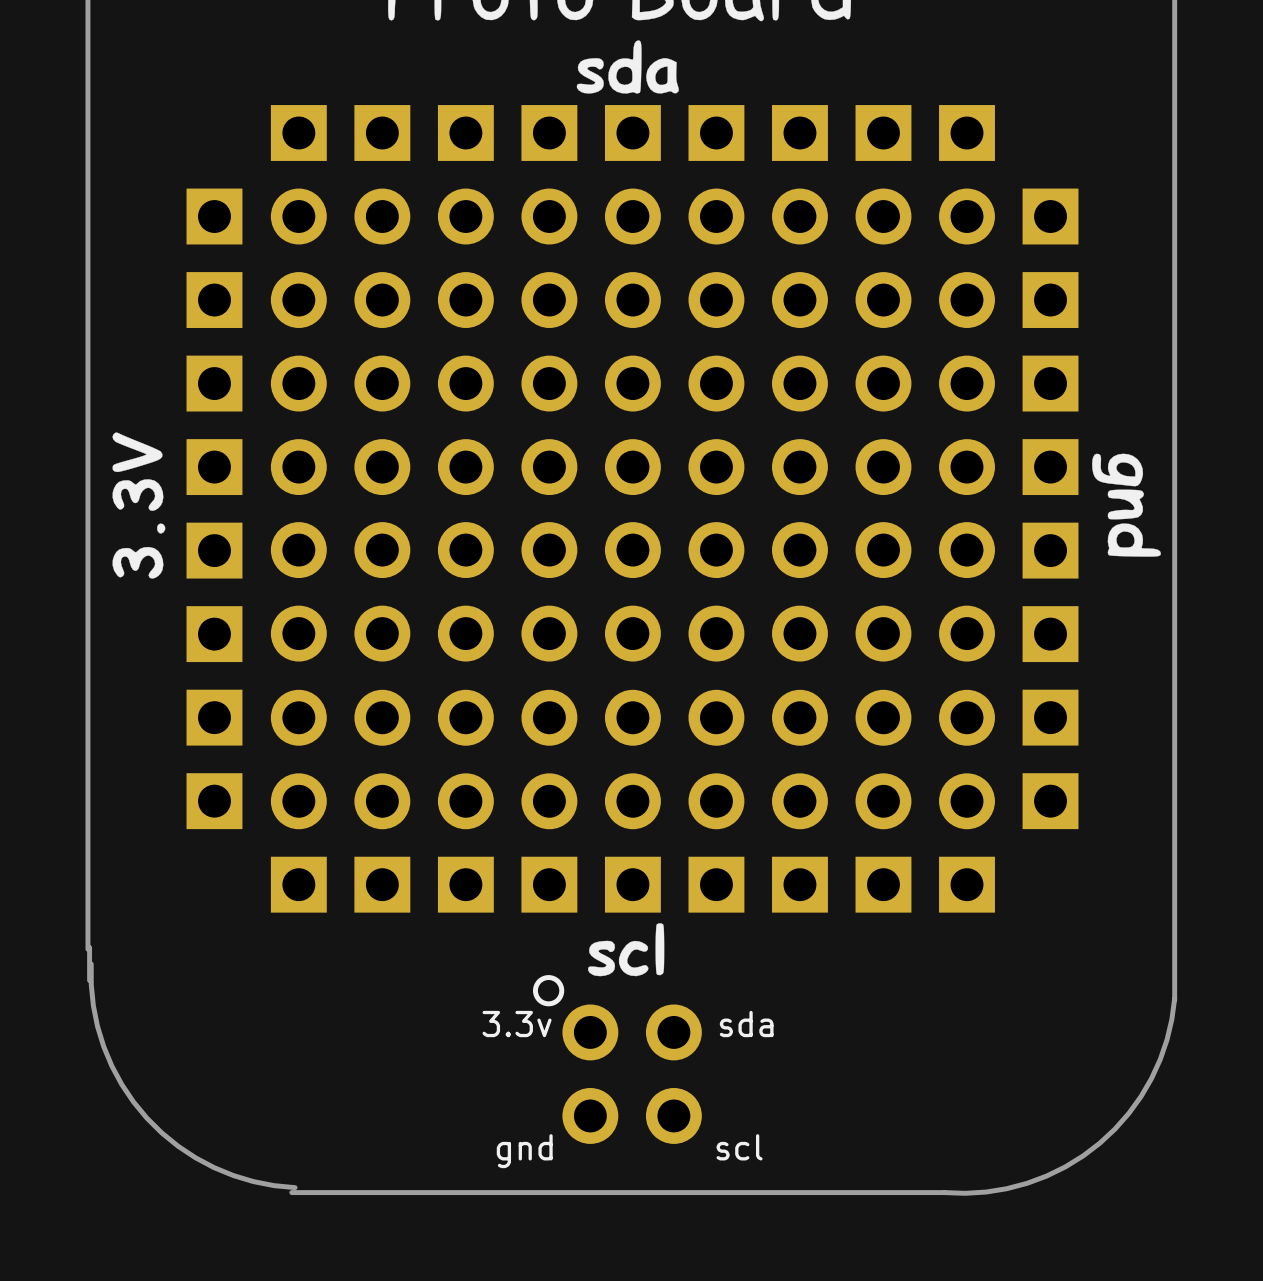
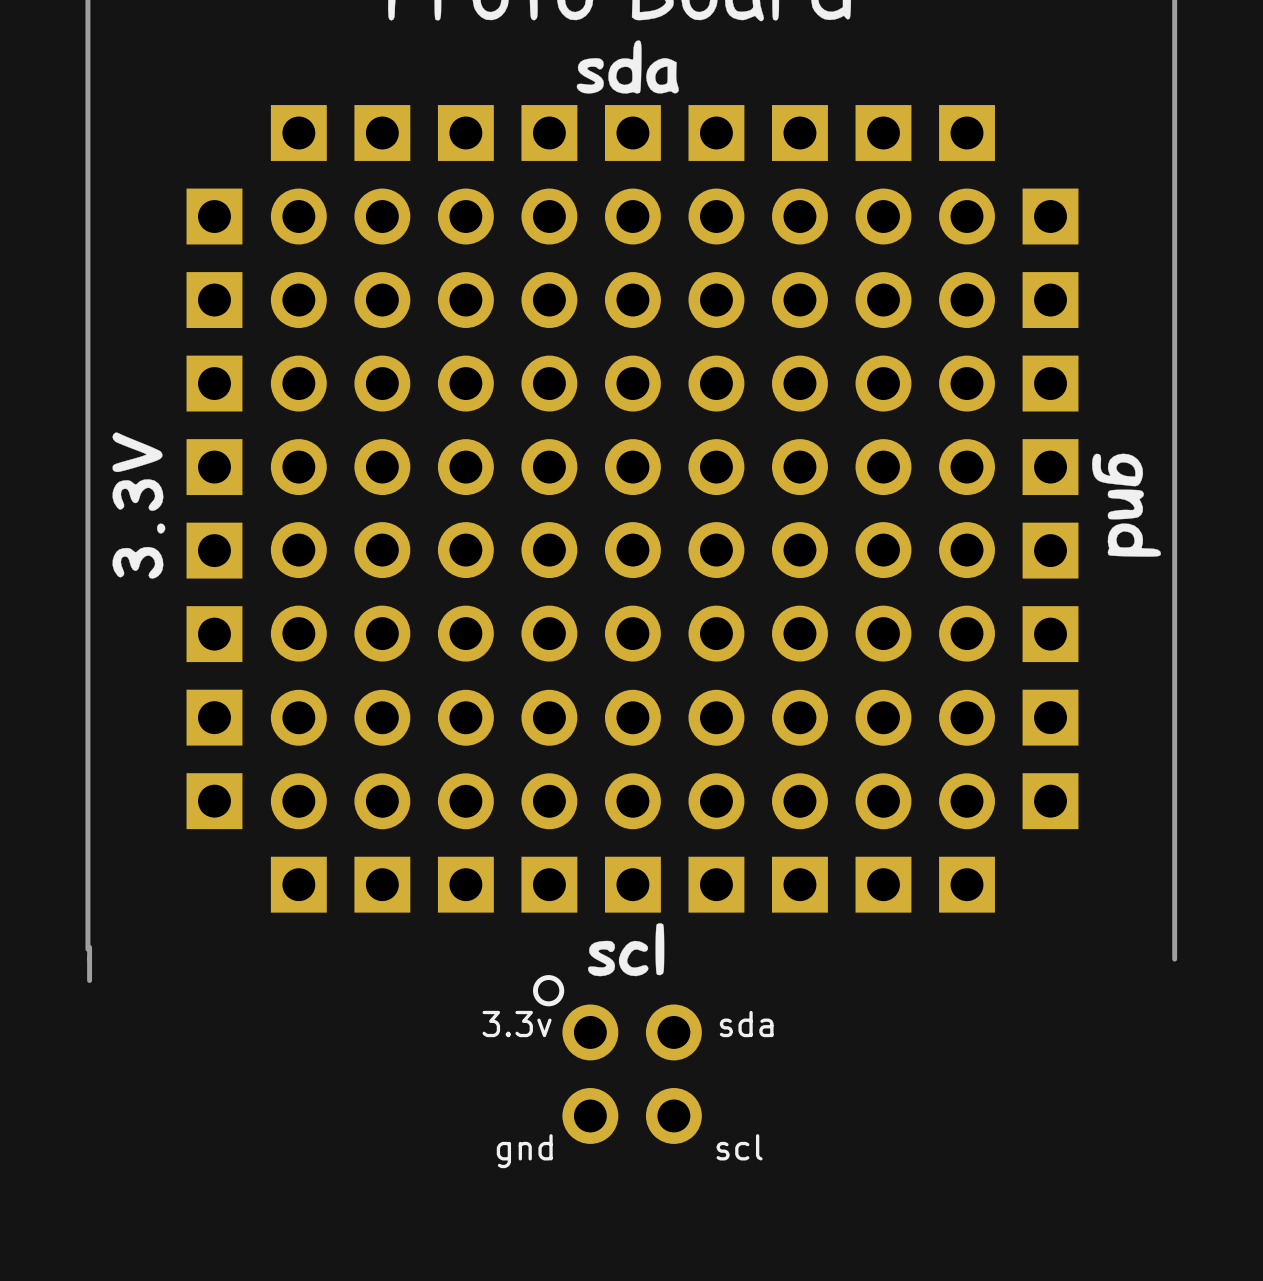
board edge: (1174, 959) (1174, 1000) -> none
board edge: (91, 964) (93, 1005) (103, 1046) (121, 1084) (146, 1118) (178, 1146) (214, 1167) (253, 1181) (295, 1187) -> none
board edge: (1174, 998) (1171, 1019) (1160, 1059) (1151, 1078) (1128, 1113) (1099, 1143) (1065, 1166) (1027, 1183) (1006, 1188) (965, 1193) (291, 1192) -> none

